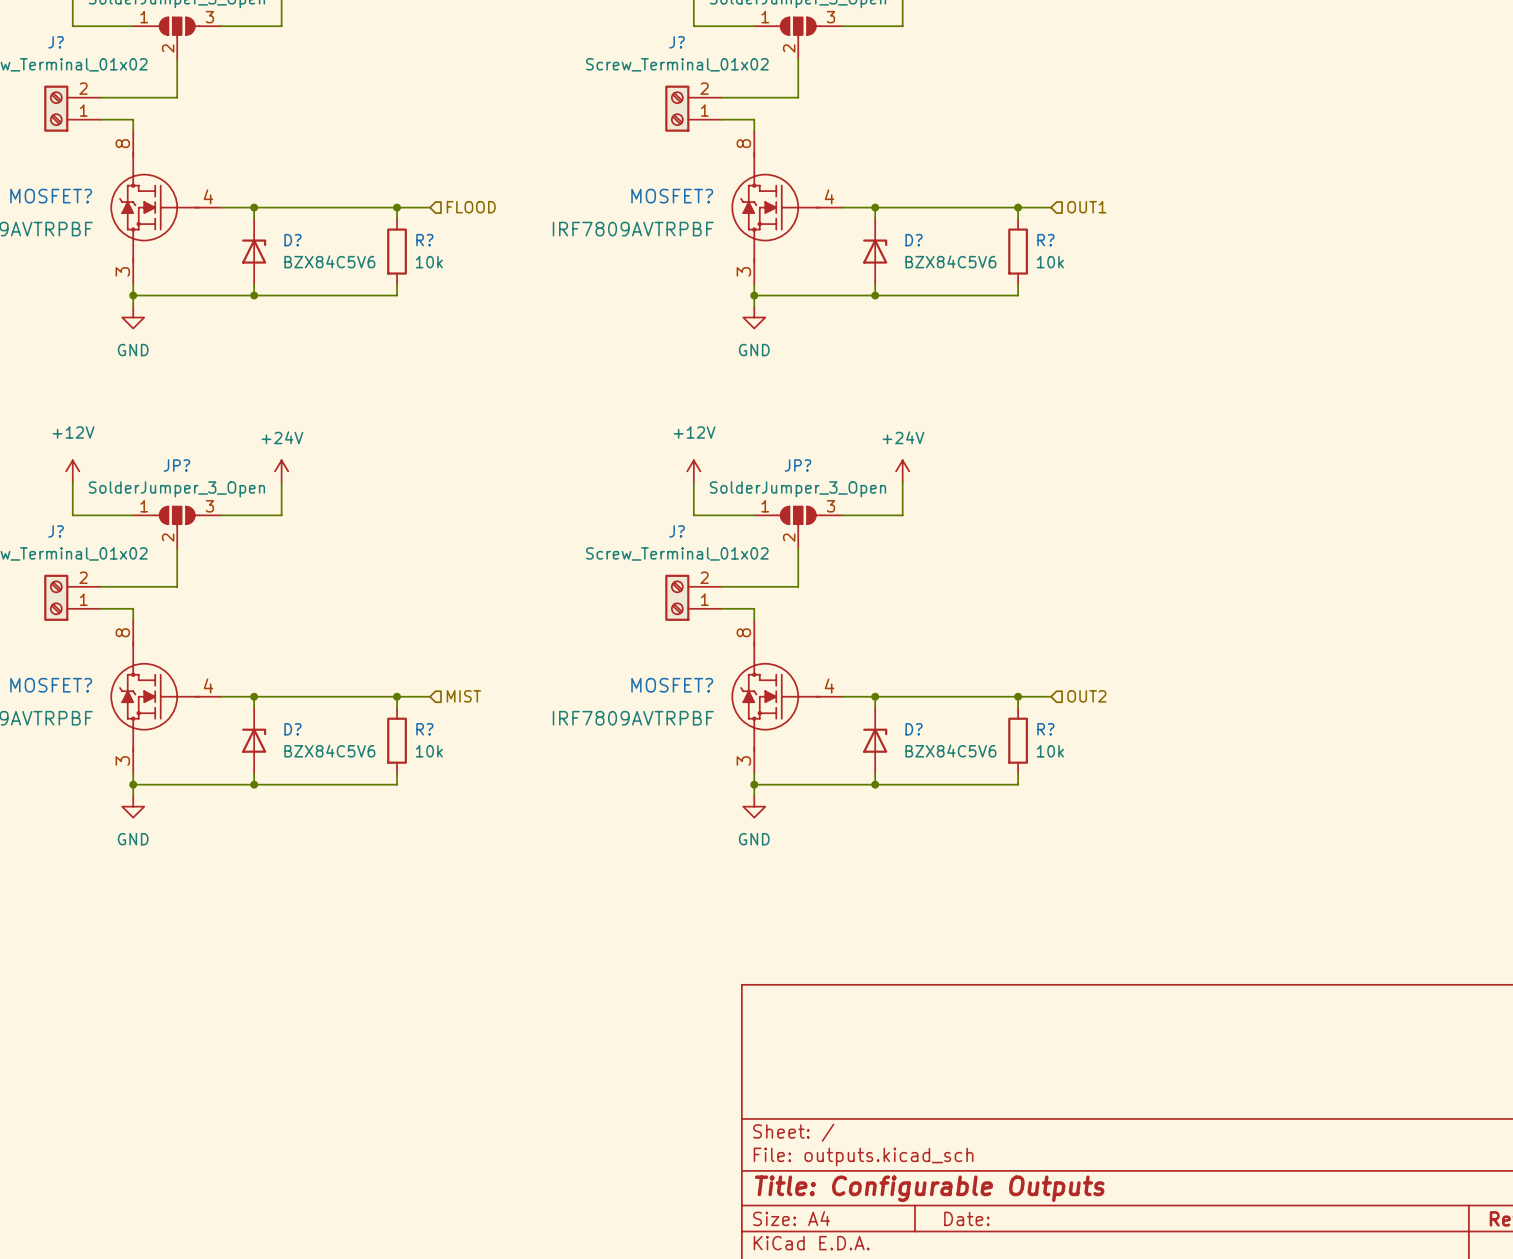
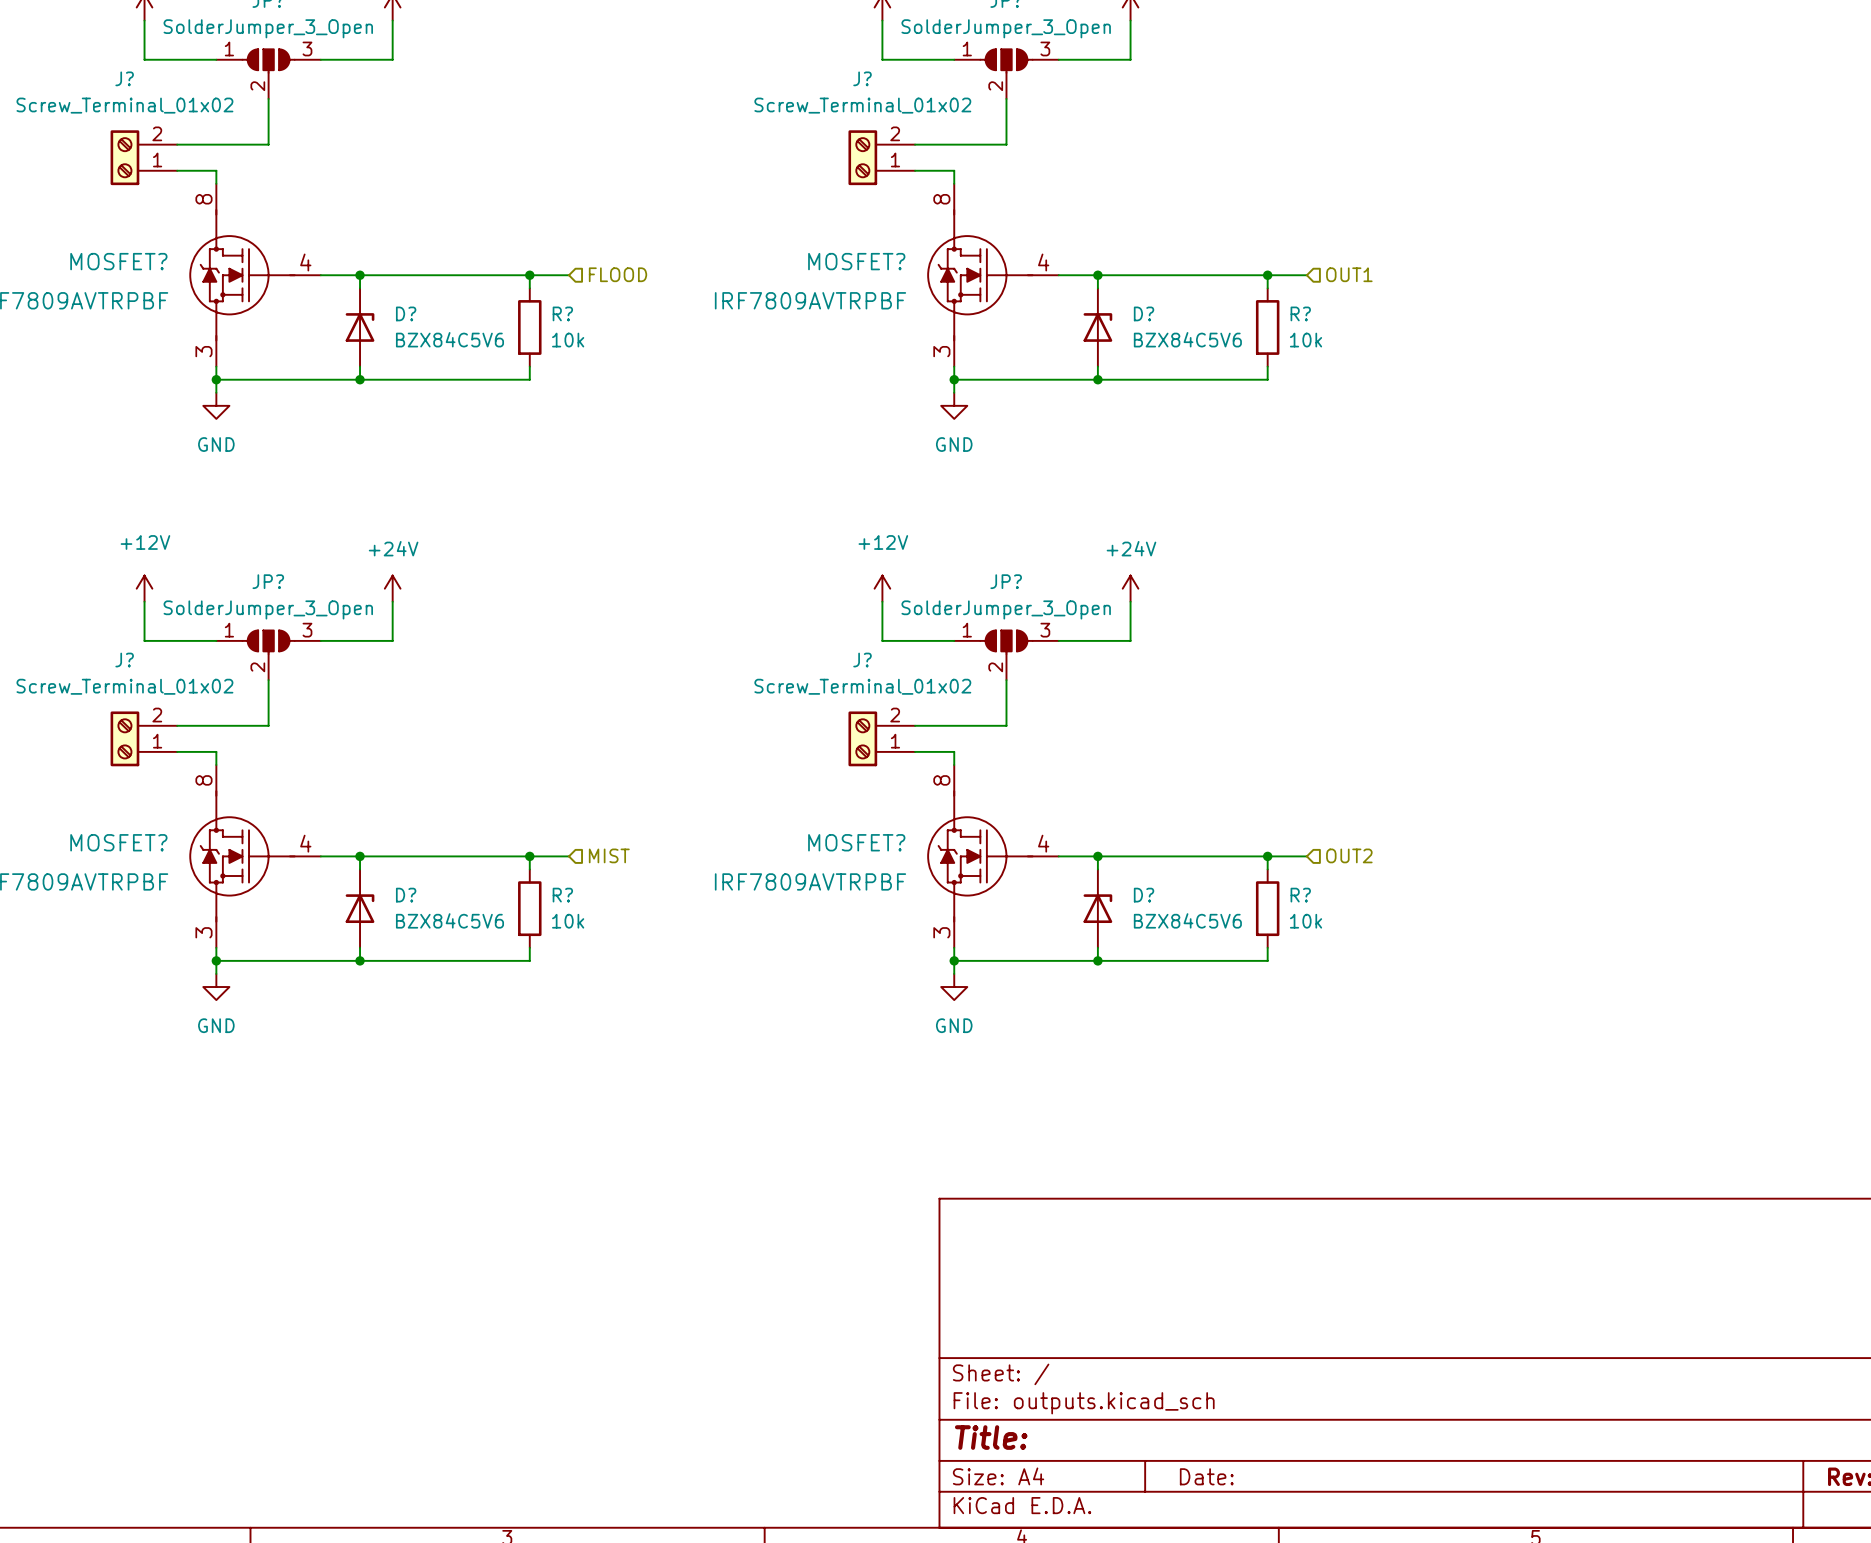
title block: Title: Configurable Outputs (929, 1188) -> Title: (991, 1437)

